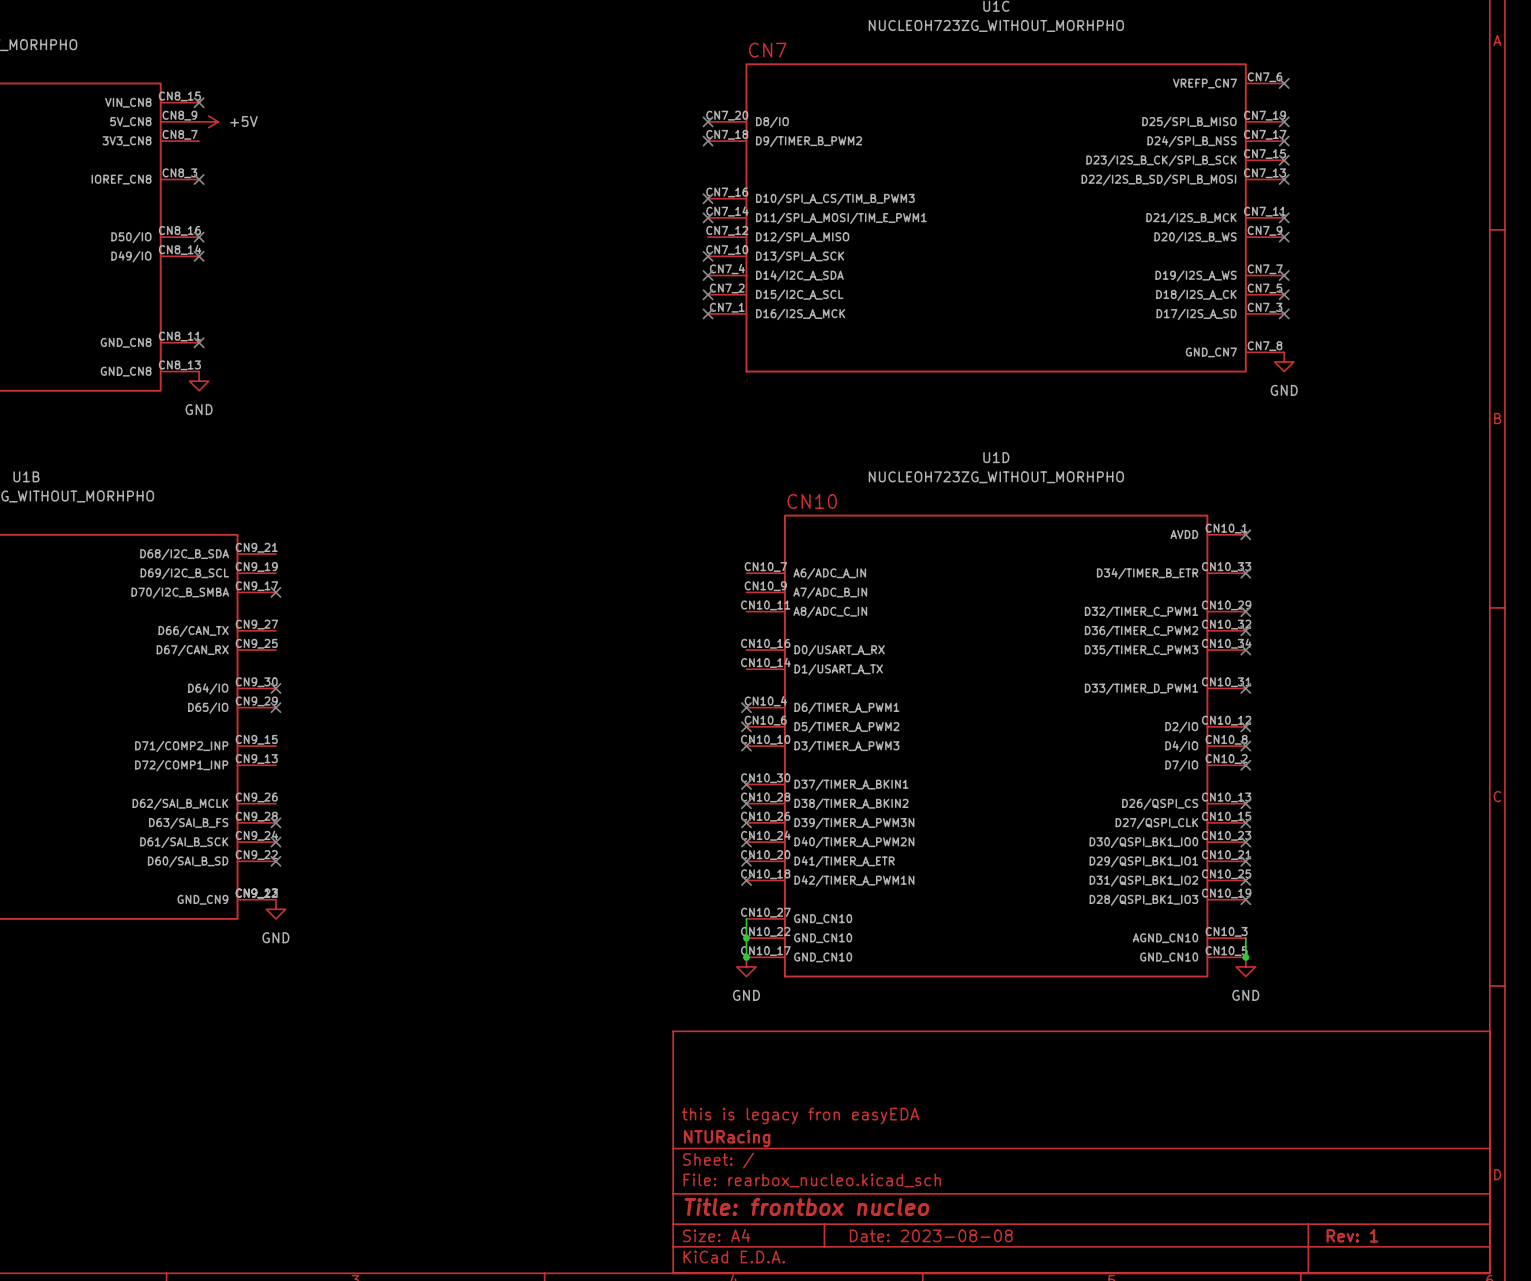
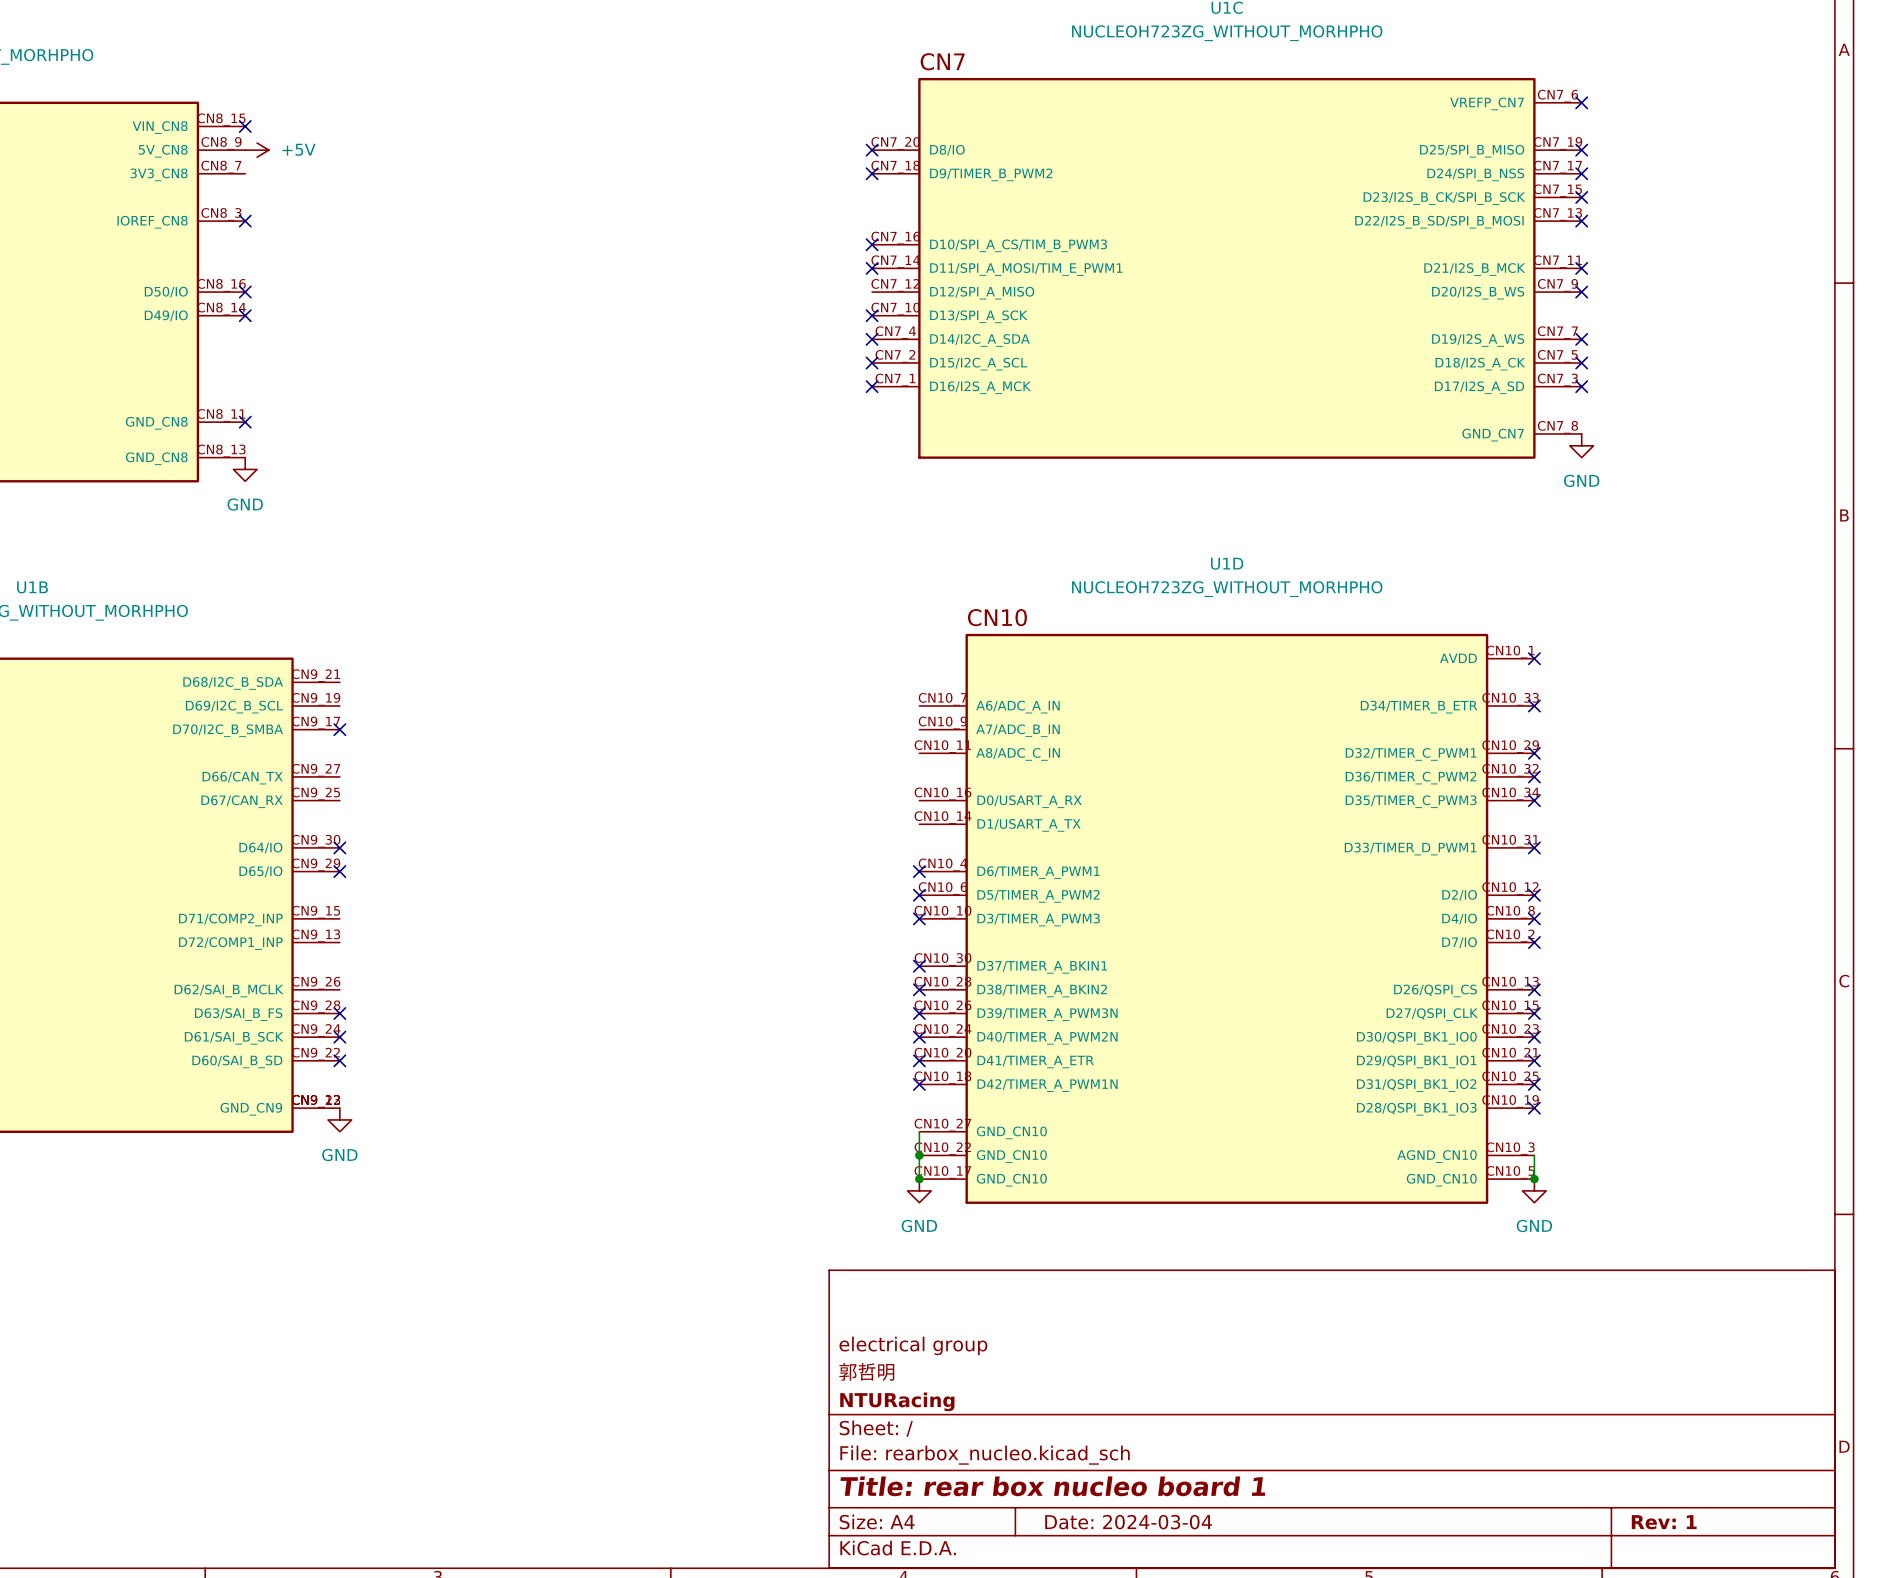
title block: none -> electrical group (913, 1345)
title block: this is legacy fron easyEDA (800, 1115) -> 郭哲明 (866, 1371)
title block: Title: frontbox nucleo (806, 1206) -> Title: rear box nucleo board 1 (1052, 1486)
title block: Date: 2023-08-08 (931, 1235) -> Date: 2024-03-04 (1128, 1522)

